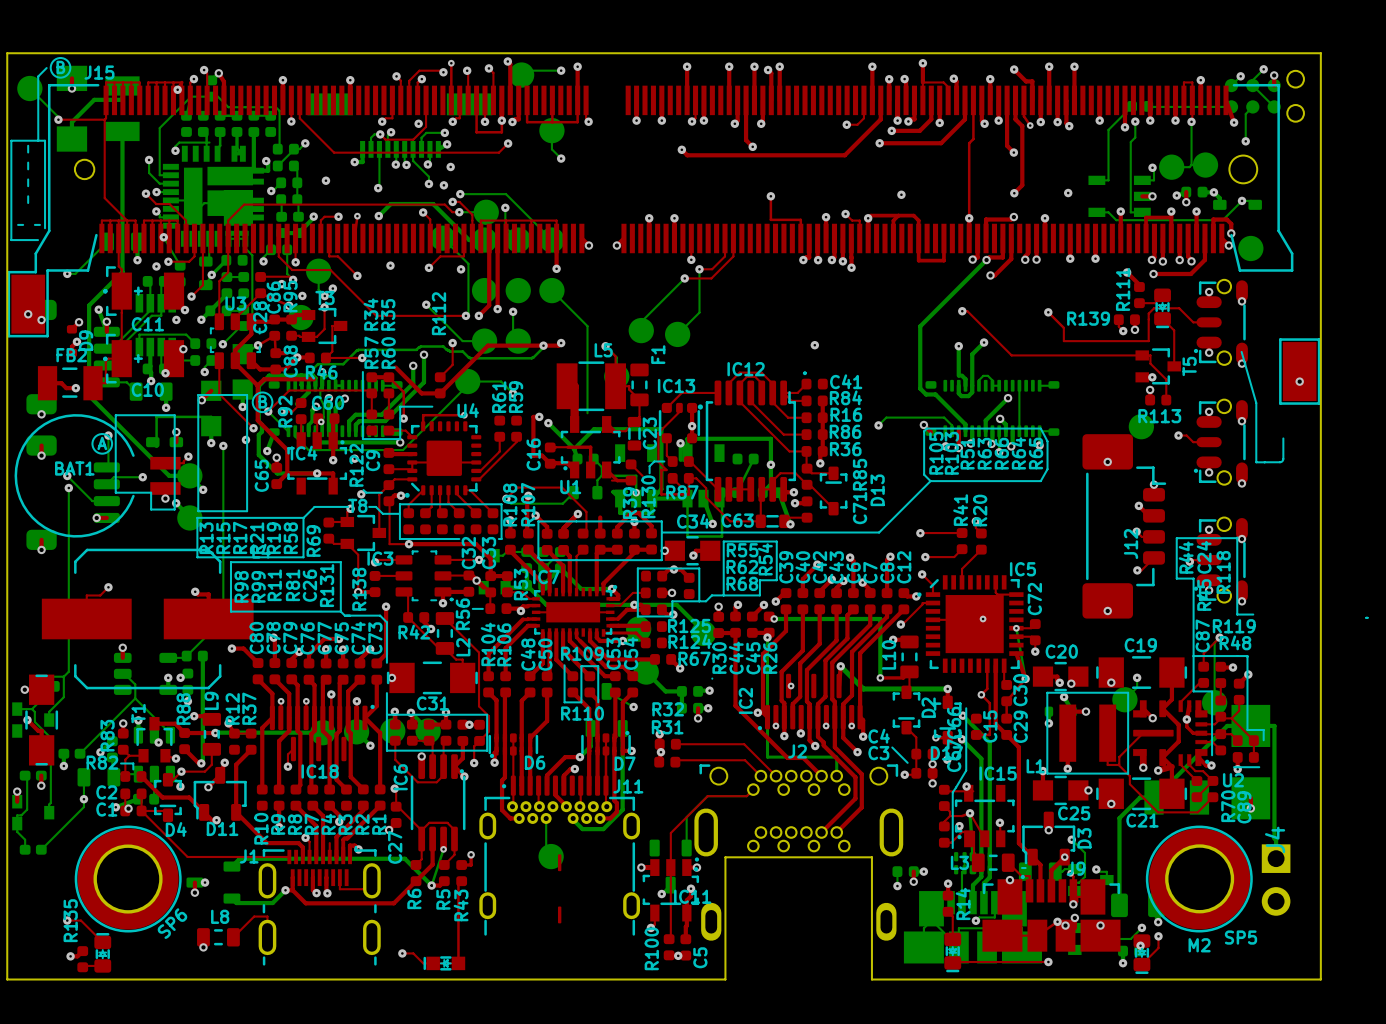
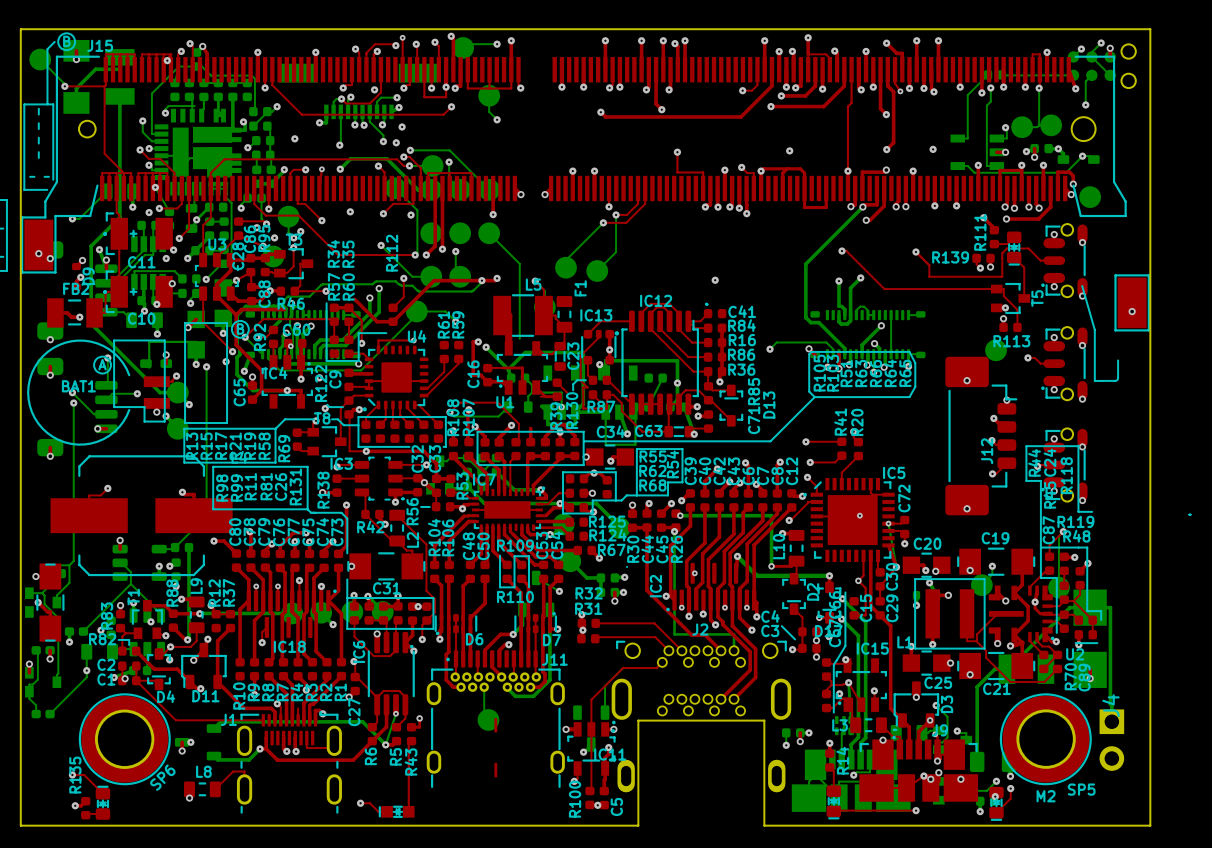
top track: (531, 220) (556, 220) (556, 238) -> none
top track: (347, 543) (358, 554) (358, 592) -> none

